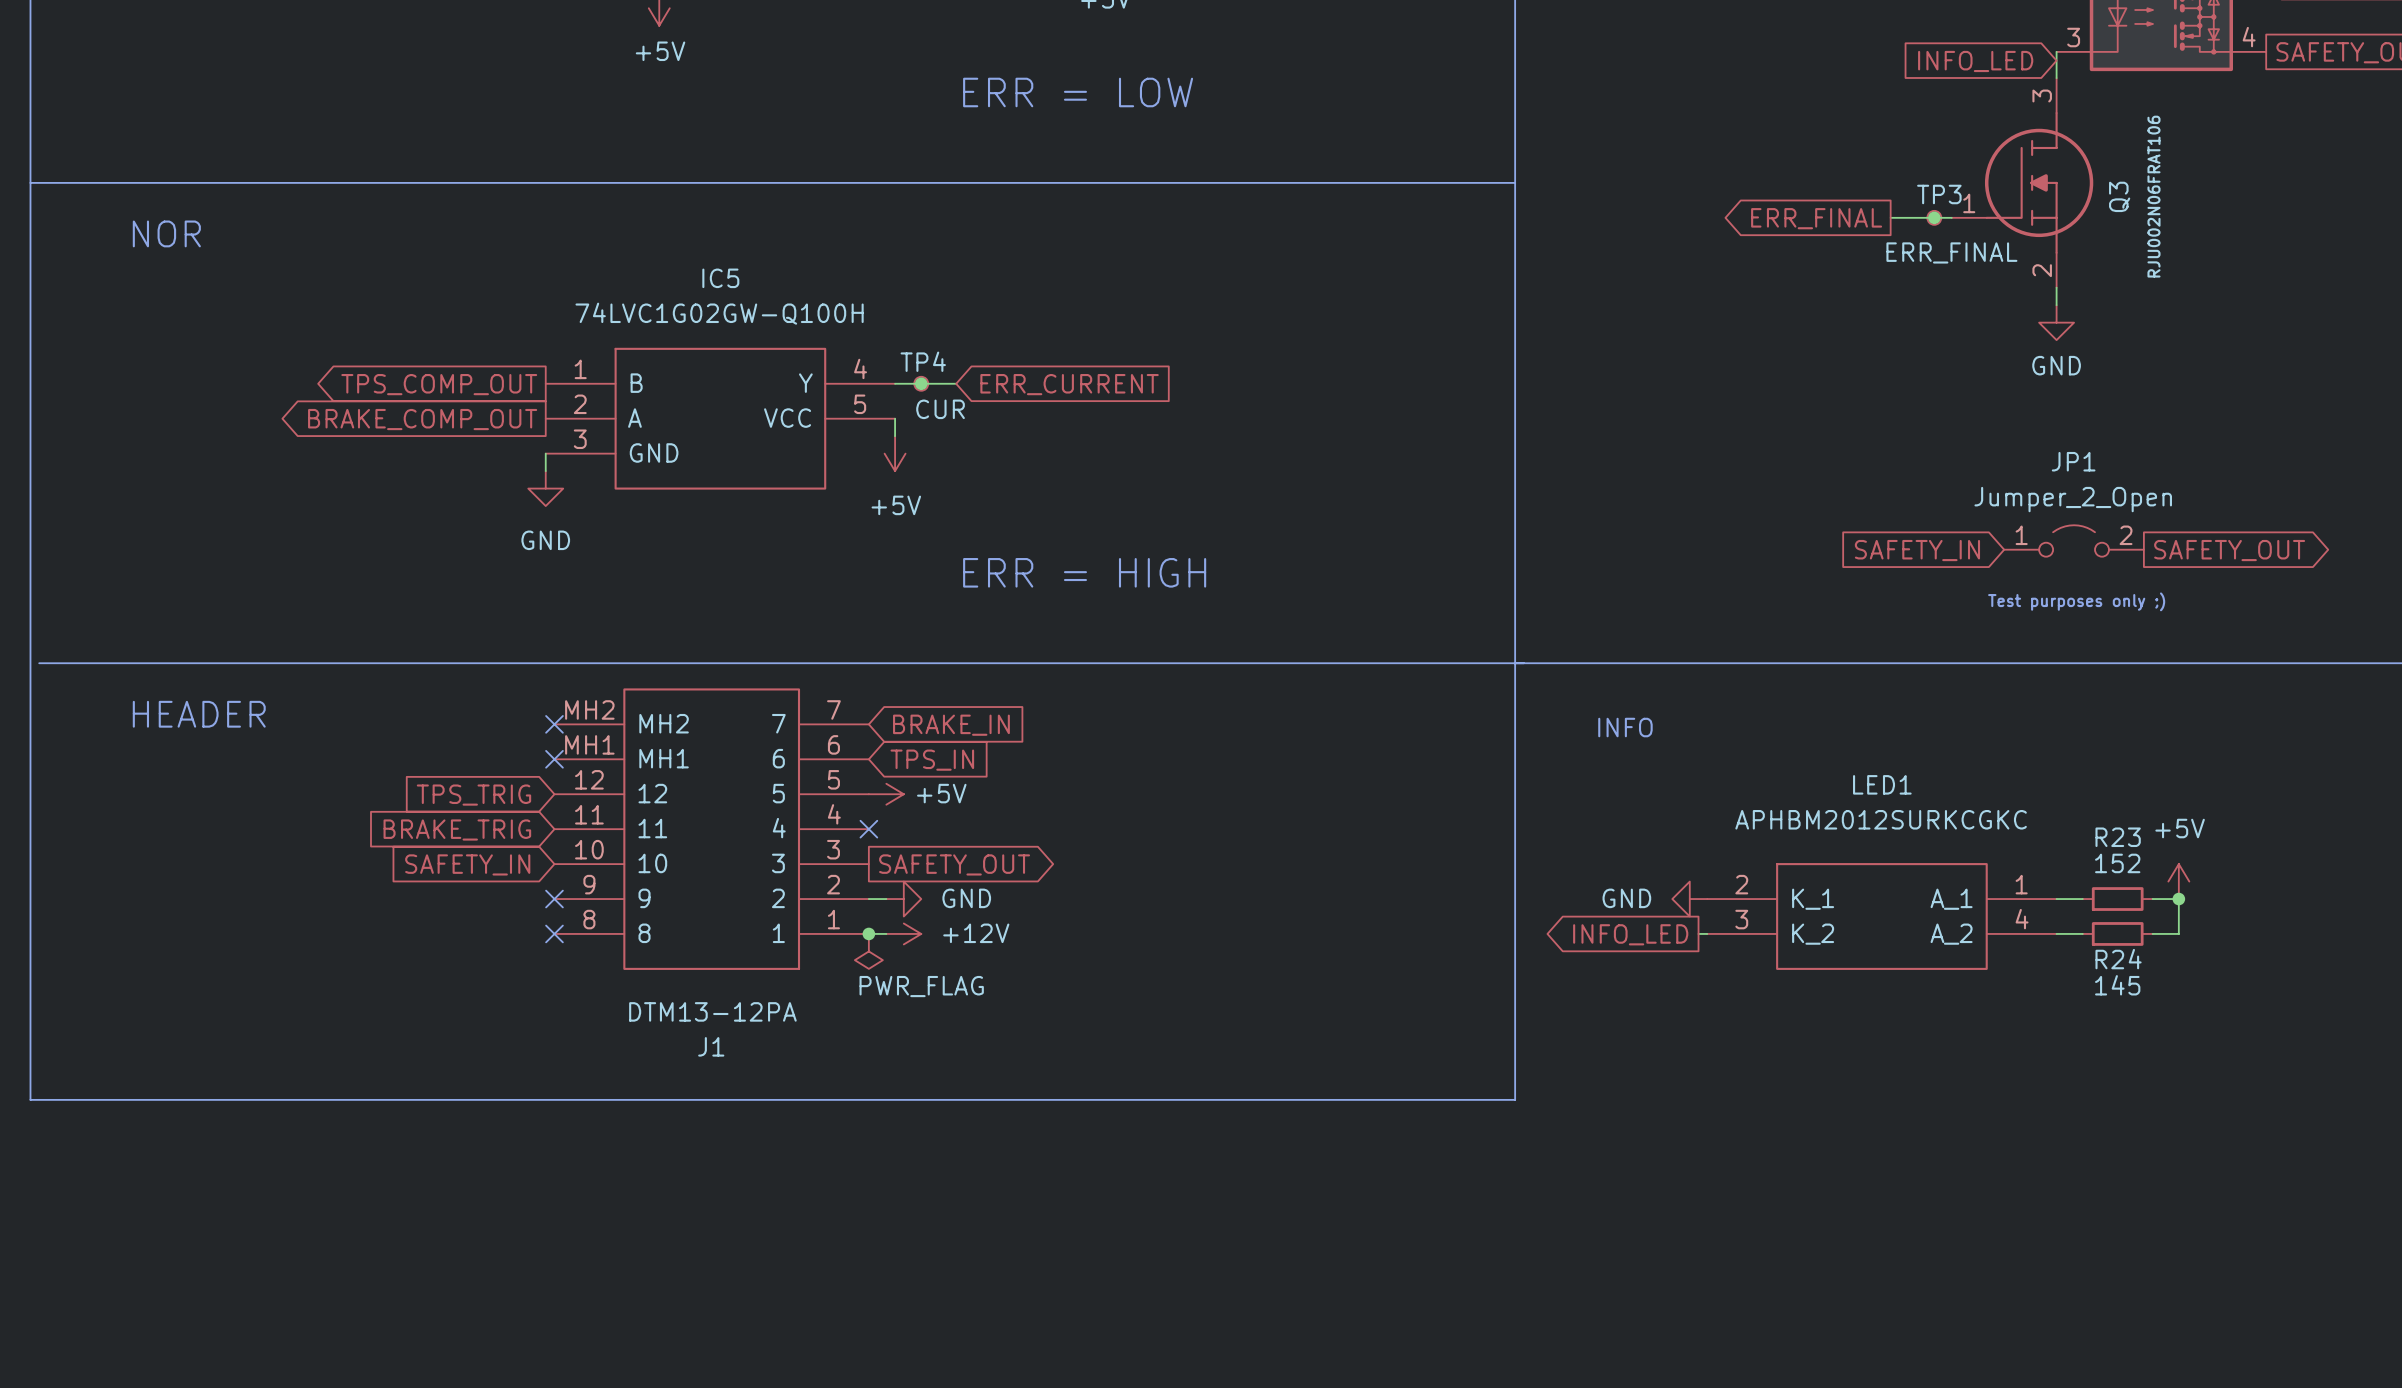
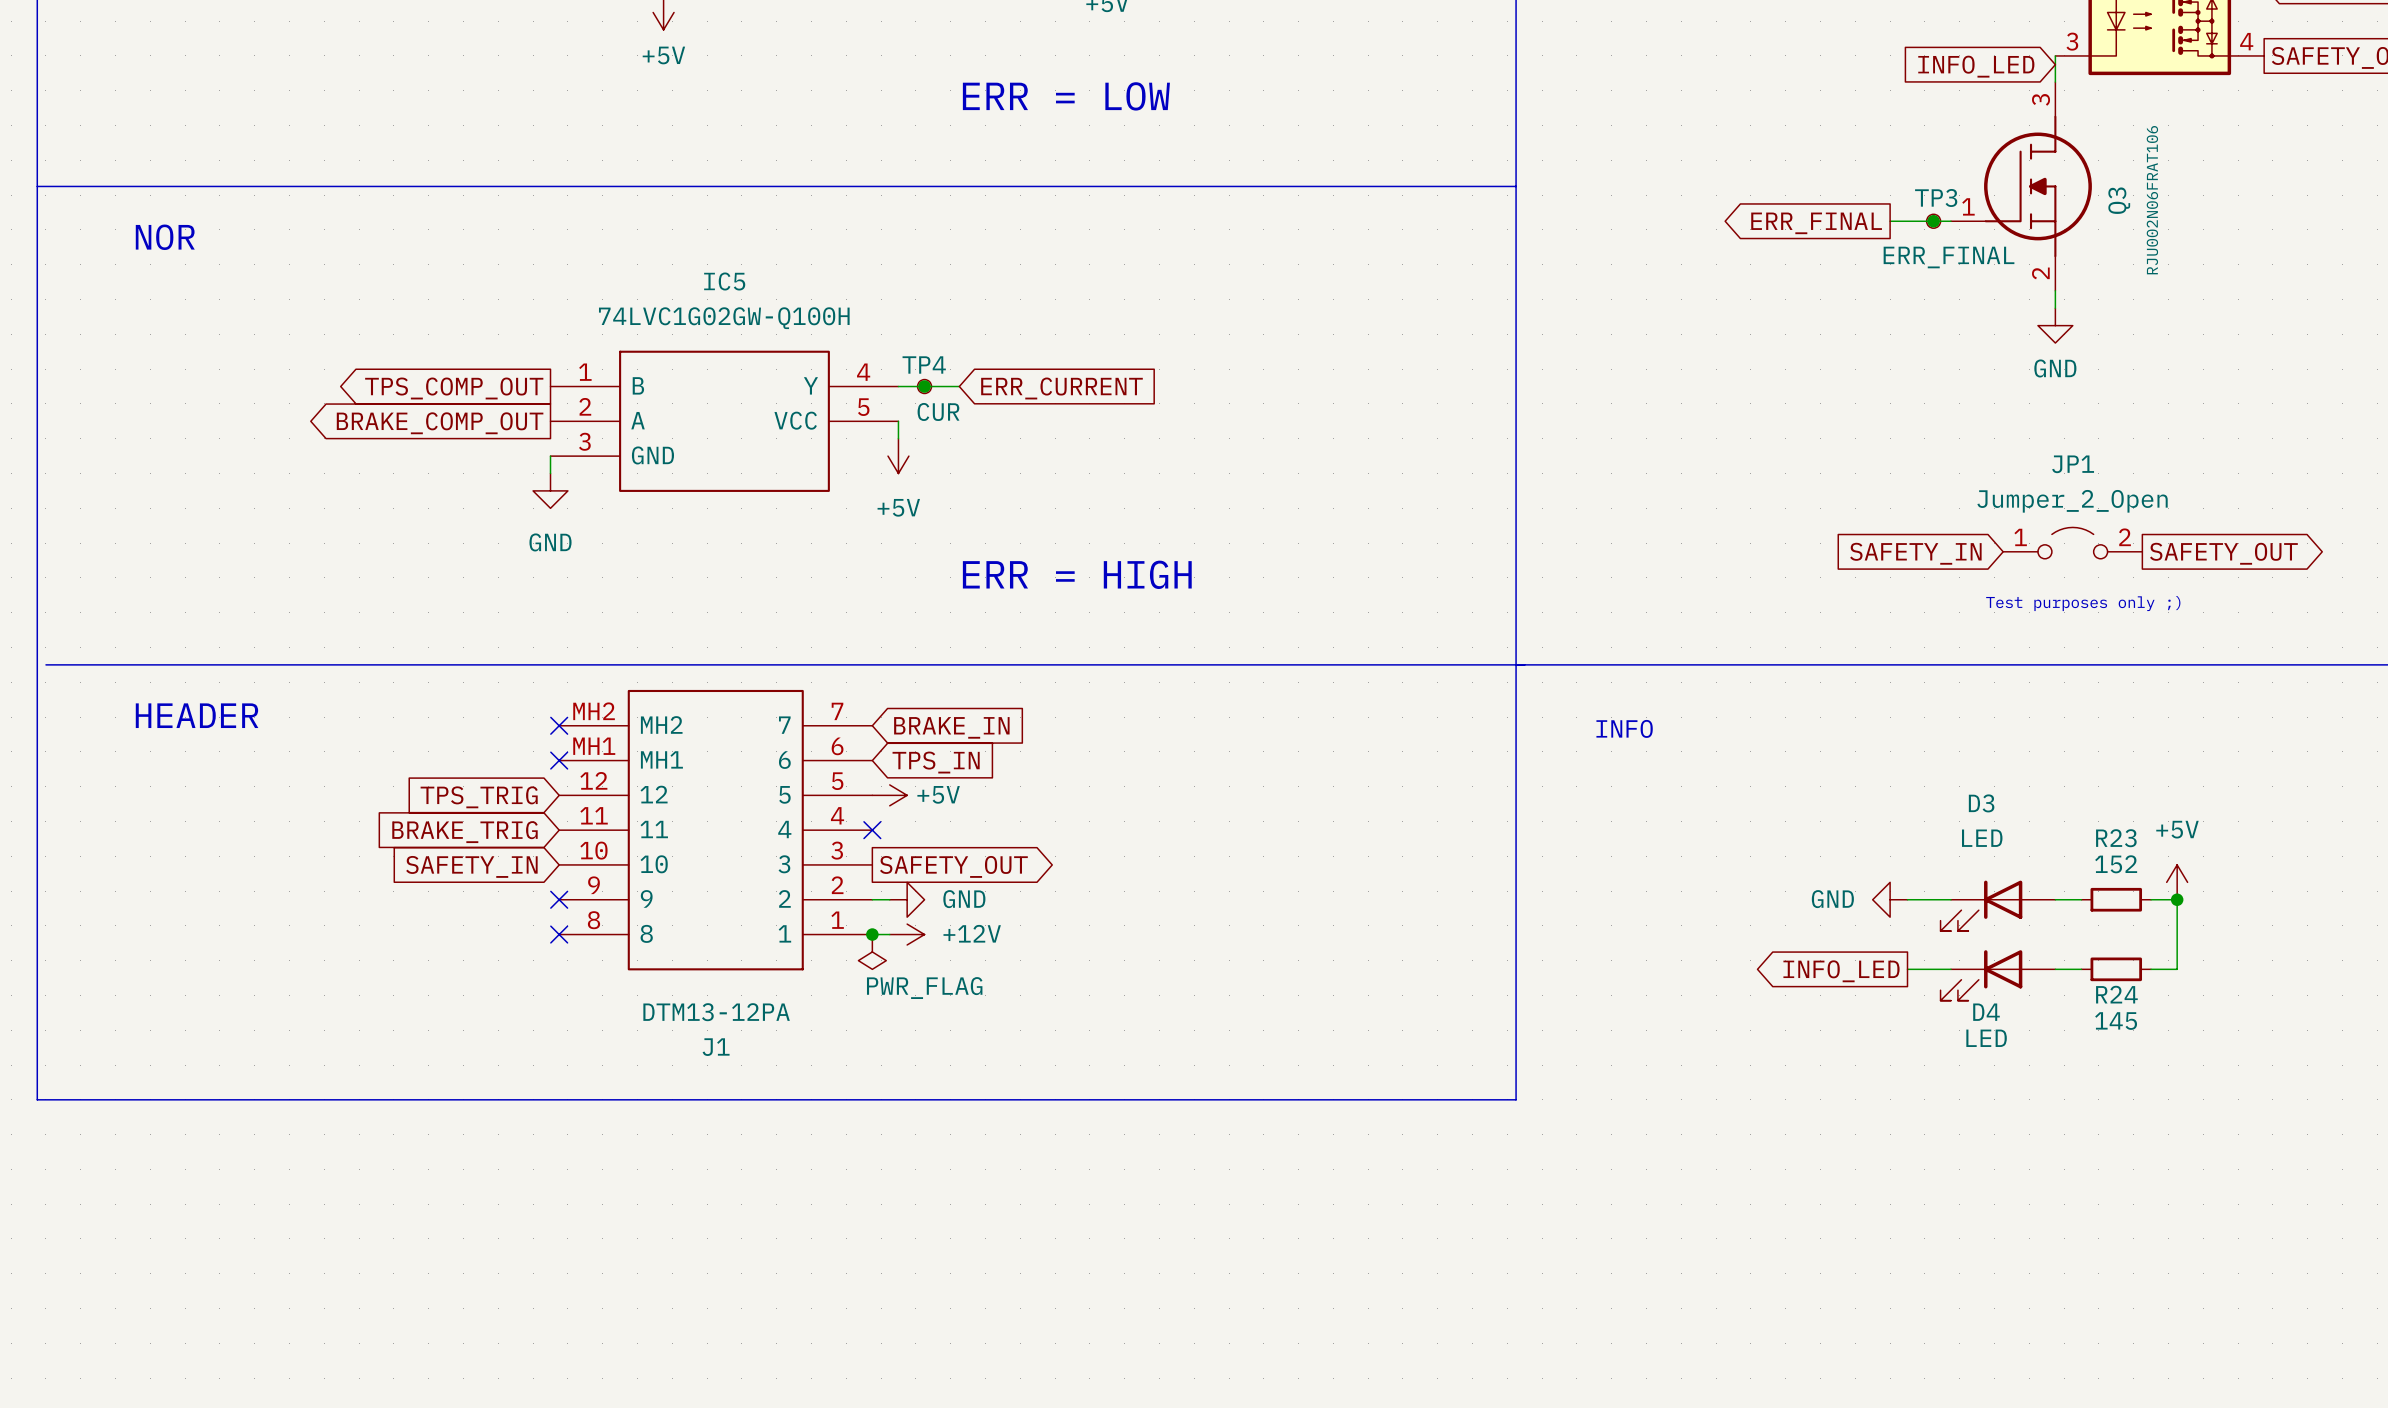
power symbol position: GND (1689, 899) -> GND (1890, 899)
wire: none -> (1907, 899) (1950, 899)
D3: none -> LED (1997, 905)
LED1: APHBM2012SURKCGKC (1881, 916) -> none
wire: (1698, 933) (1707, 933) -> none
wire: (2056, 933) (2082, 933) -> (2055, 969) (2081, 969)
R24 position: (2117, 933) -> (2116, 969)
wire: (2152, 933) (2178, 933) -> (2151, 969) (2177, 969) (2177, 934)
global label position: INFO_LED (1630, 934) -> INFO_LED (1841, 971)
D4: none -> LED (1997, 975)

